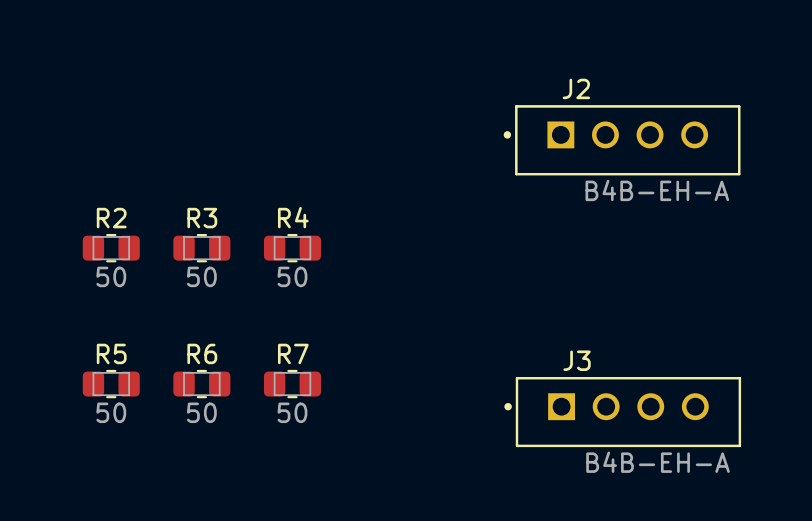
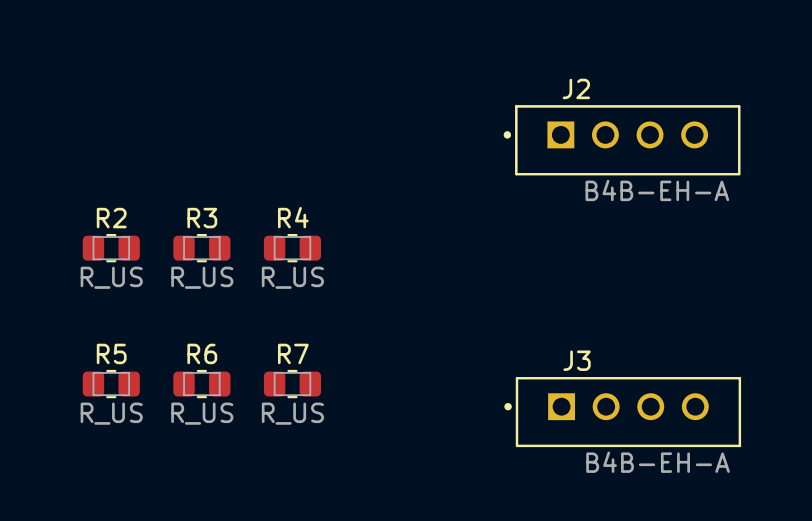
R2 value: 50 (111, 276) -> R_US (111, 277)
R3 value: 50 (201, 276) -> R_US (202, 277)
R4 value: 50 (292, 276) -> R_US (292, 277)
R5 value: 50 (111, 412) -> R_US (111, 413)
R6 value: 50 (201, 412) -> R_US (202, 413)
R7 value: 50 (292, 412) -> R_US (292, 413)

